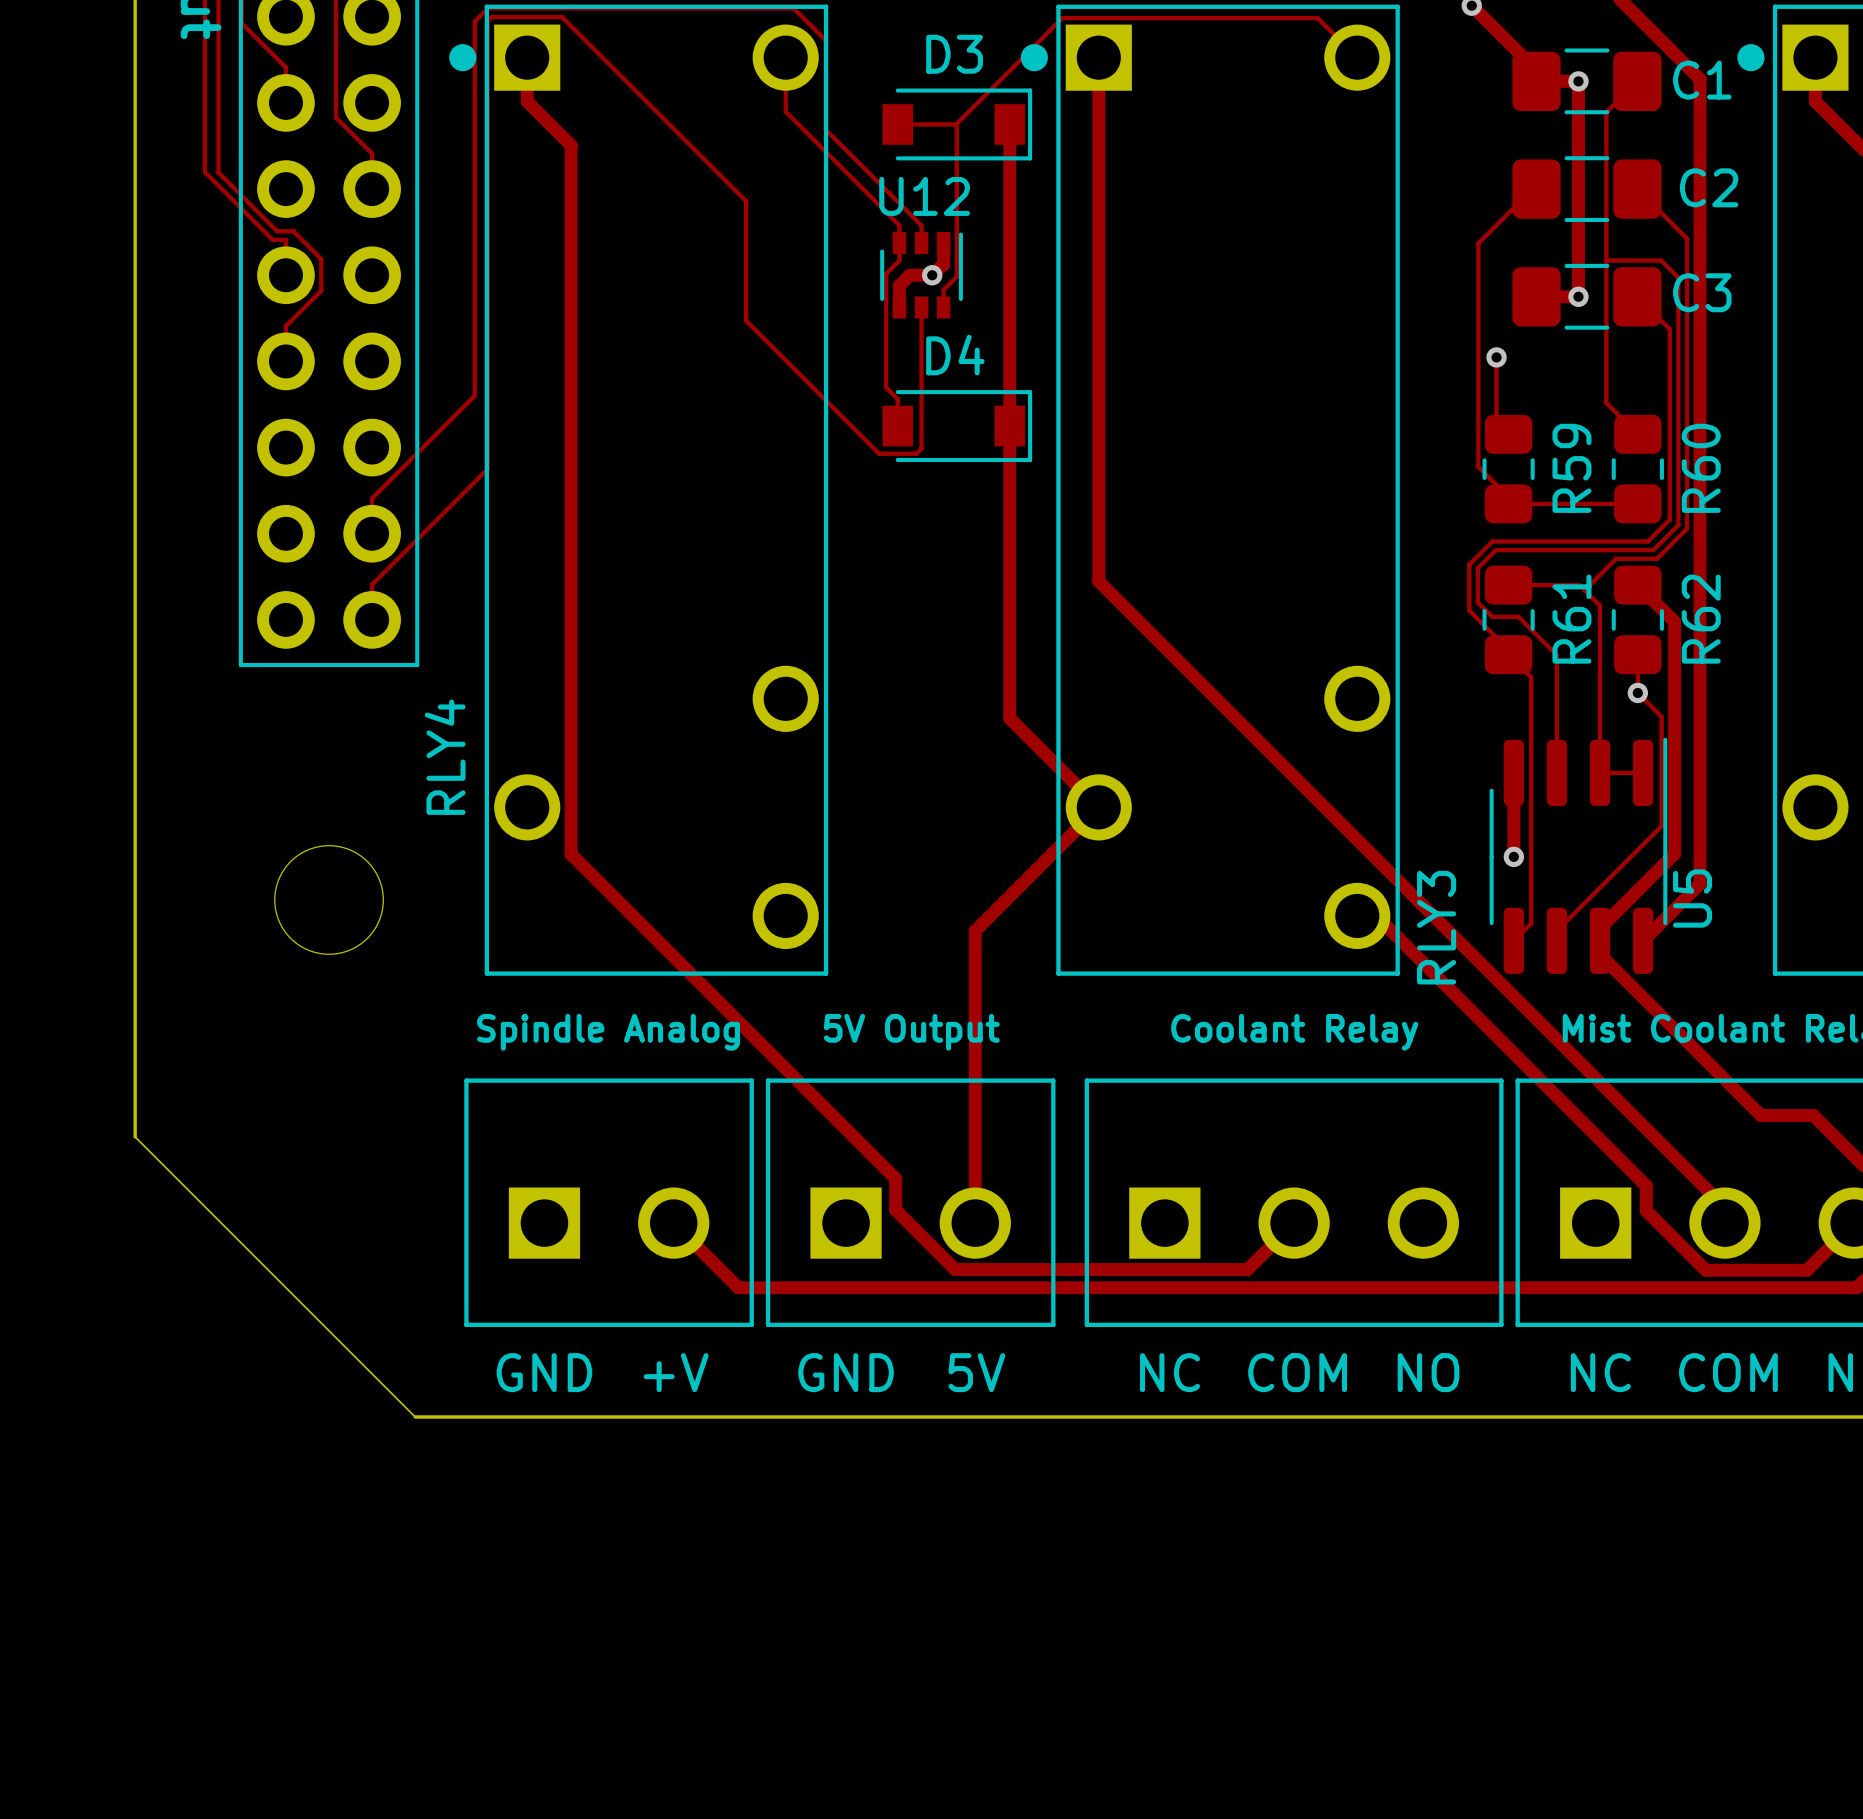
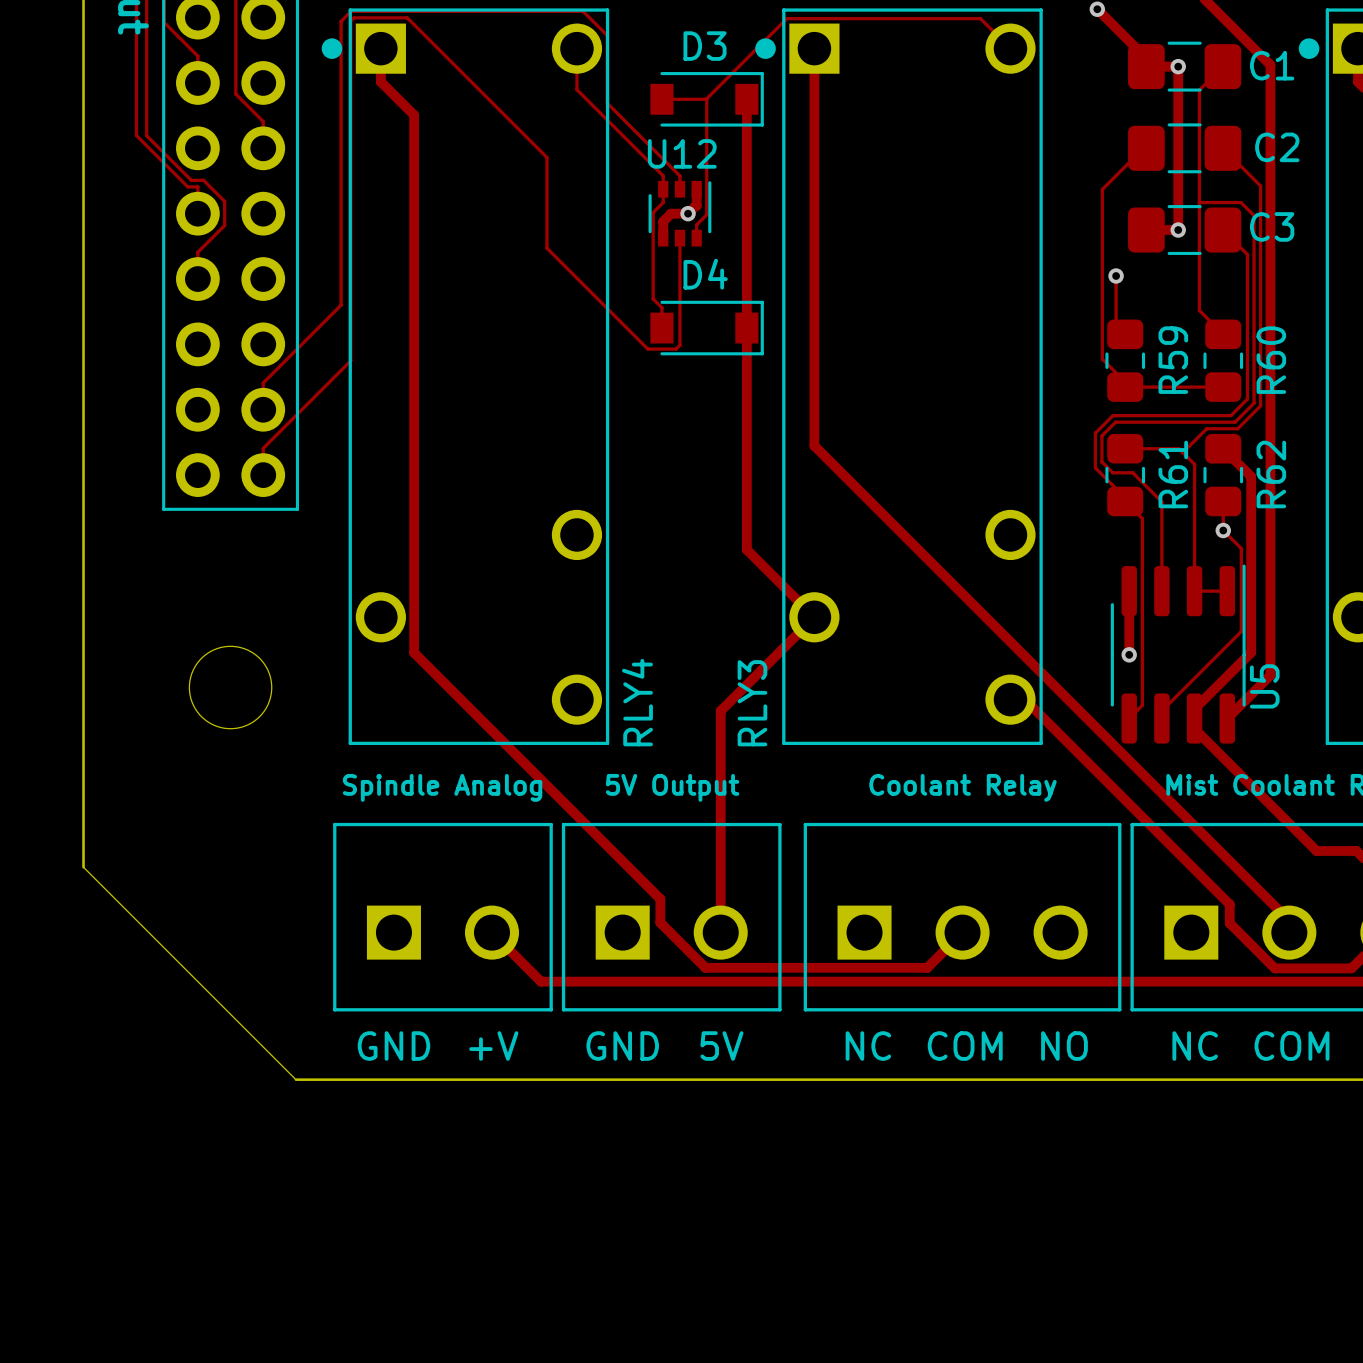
RLY4 name position: RLY4 (445, 757) -> RLY4 (637, 702)
RLY3 name position: RLY3 (1436, 927) -> RLY3 (752, 703)

